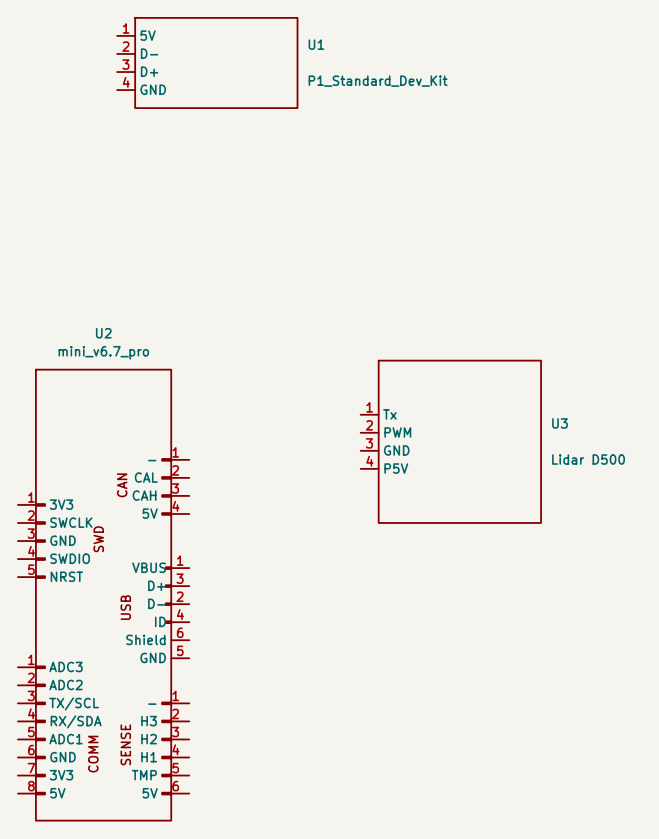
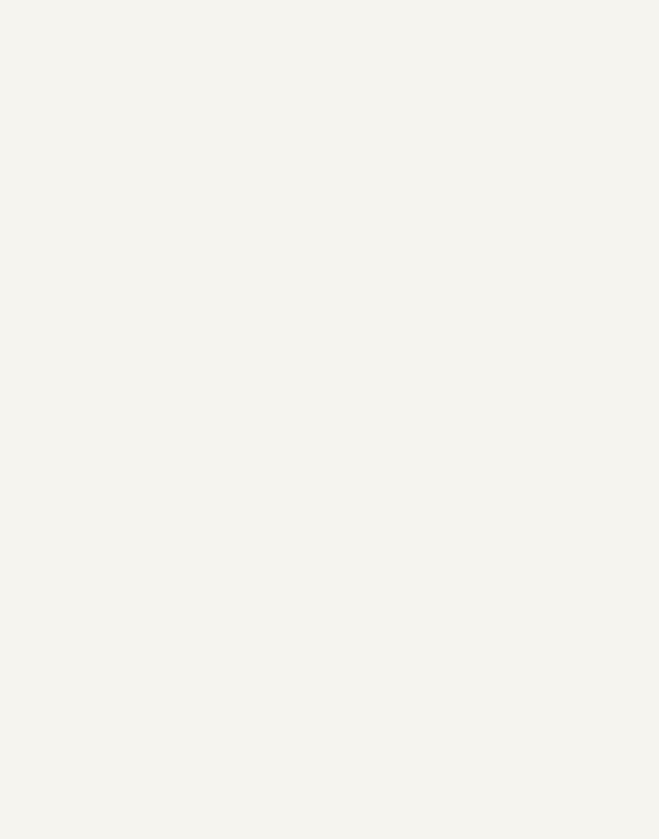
U1: (207, 62) -> none
U3: (450, 441) -> none
U2: (103, 595) -> none

